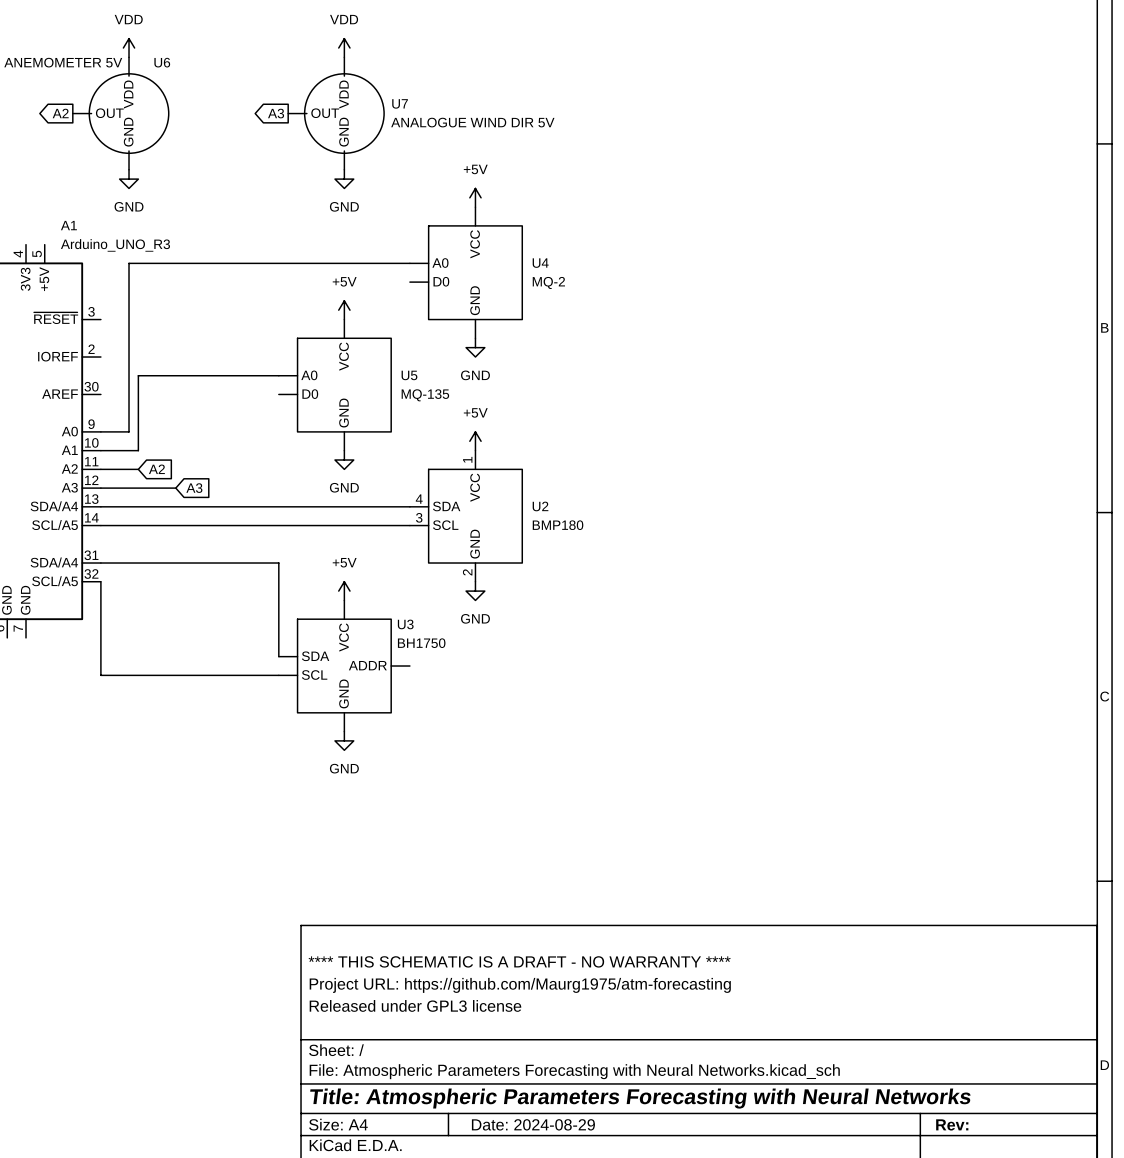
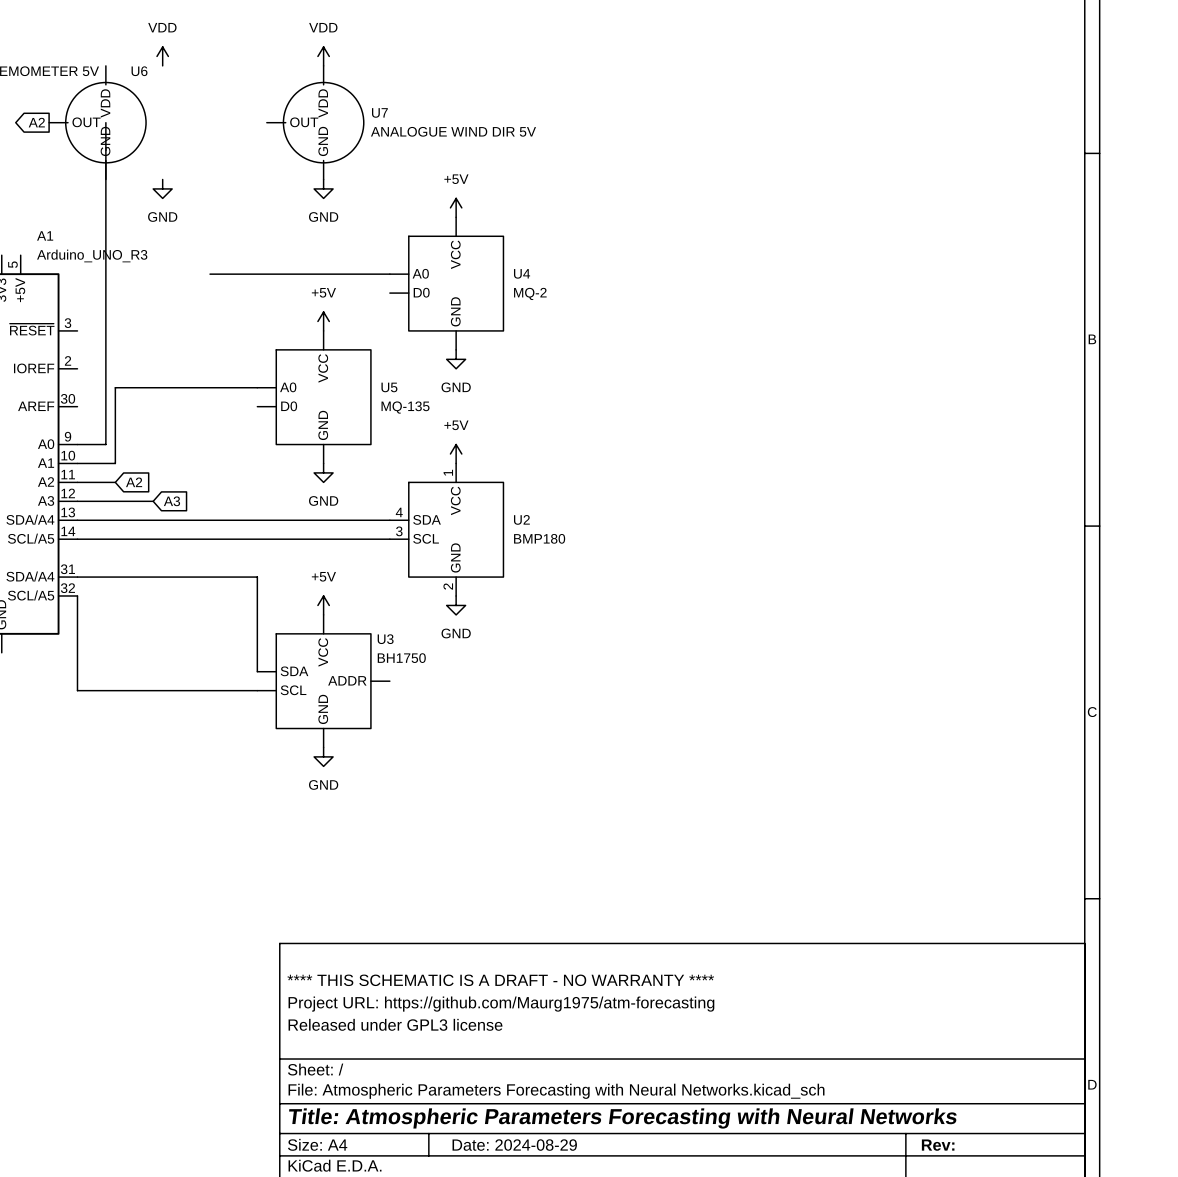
power symbol position: VDD (129, 48) -> VDD (162, 56)
global label: A3 (276, 113) -> none
power symbol position: GND (129, 179) -> GND (162, 188)
wire: (129, 263) (232, 263) -> (105, 274) (105, 122)

